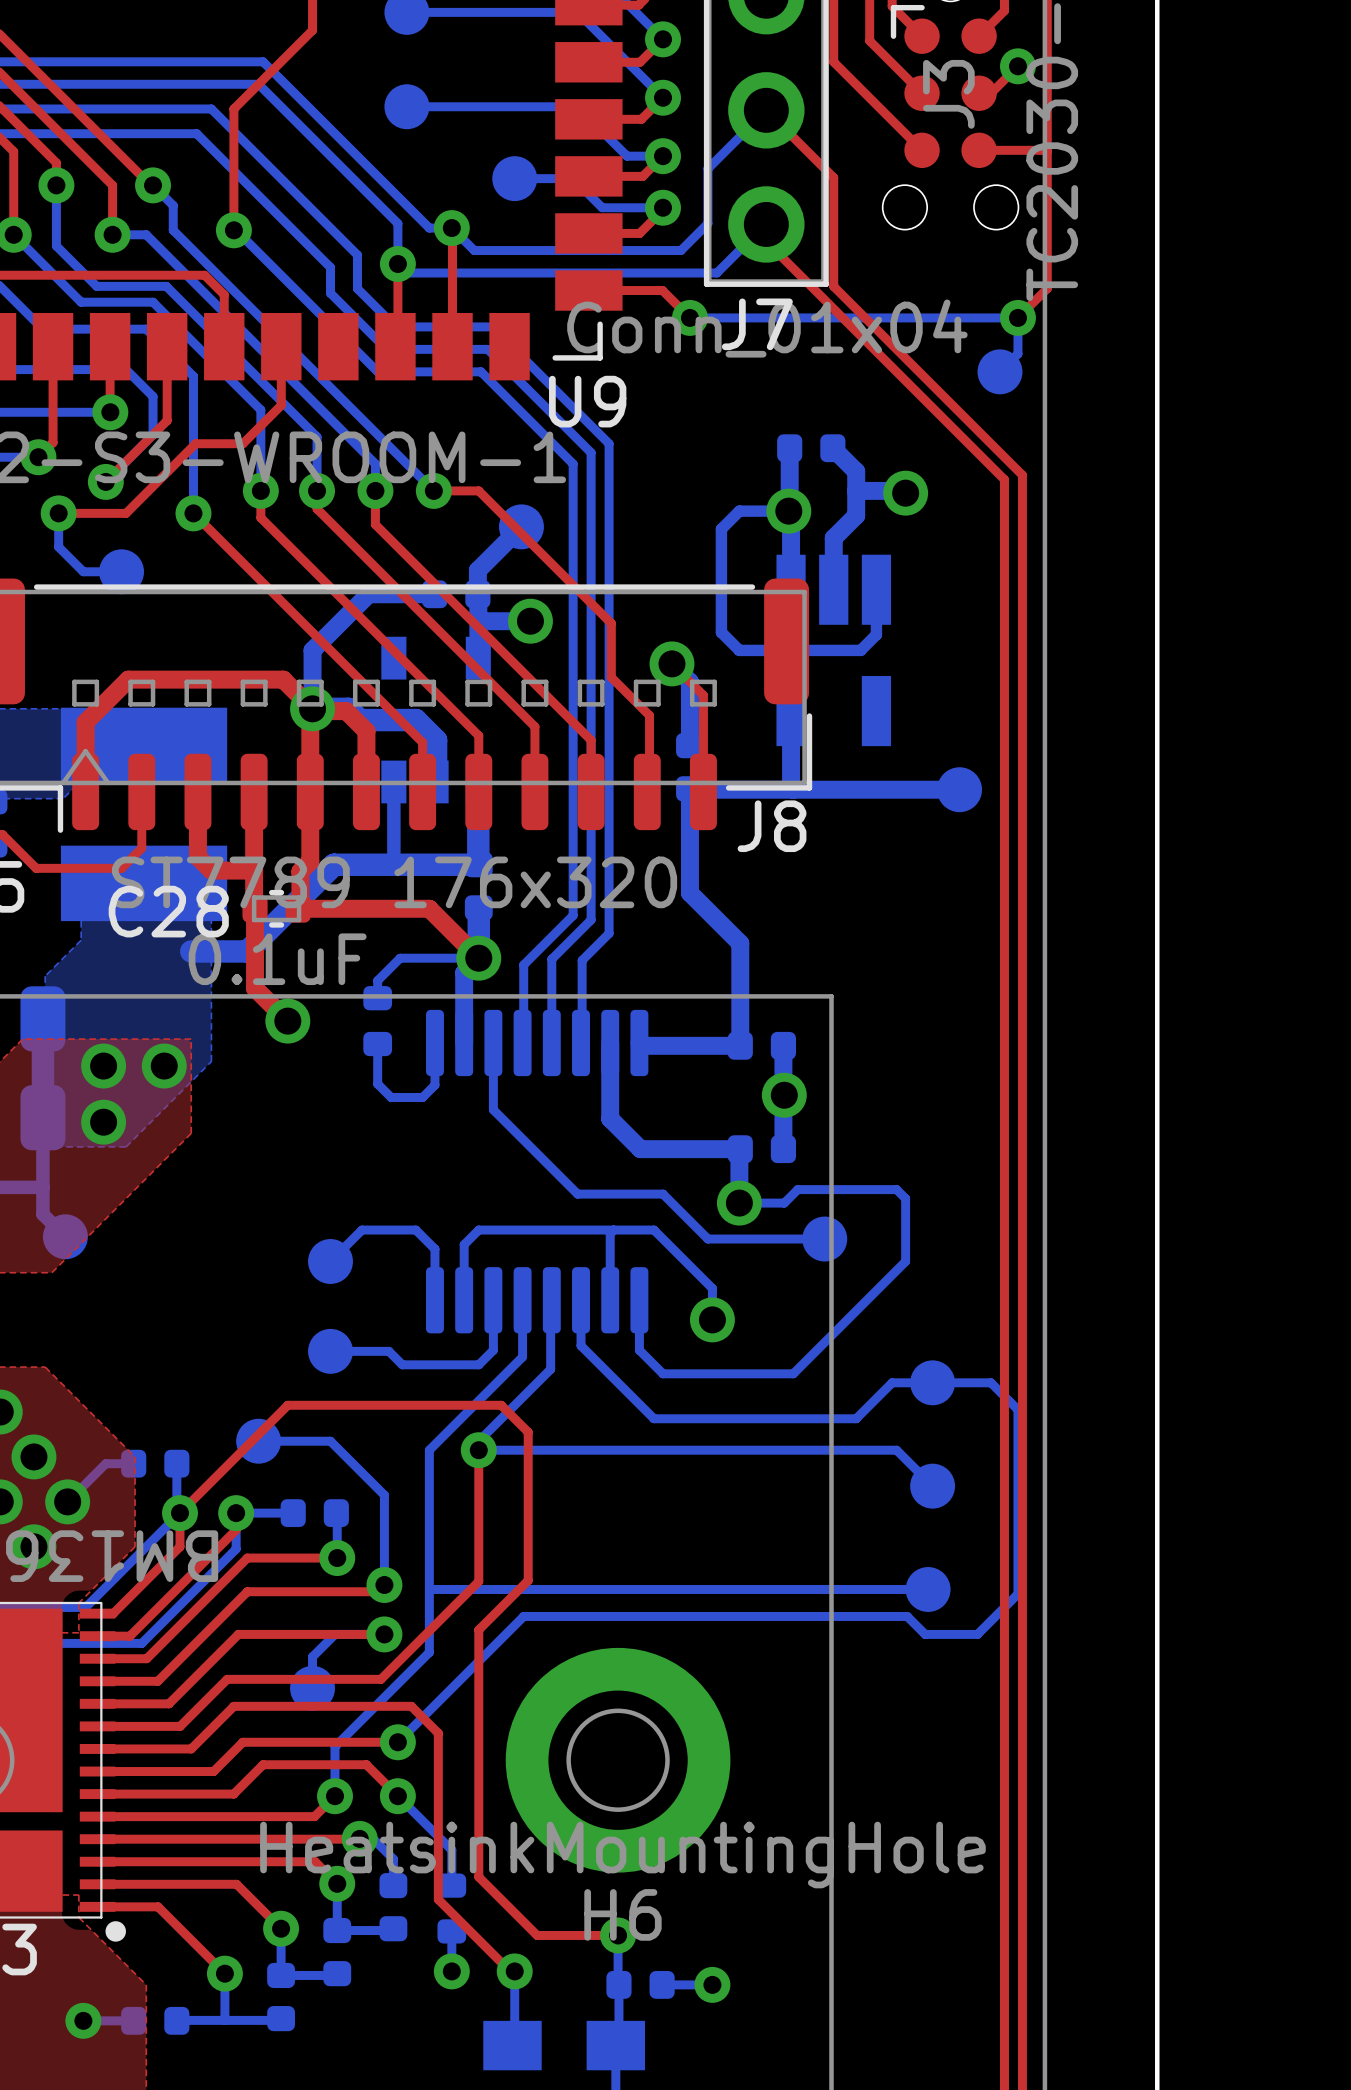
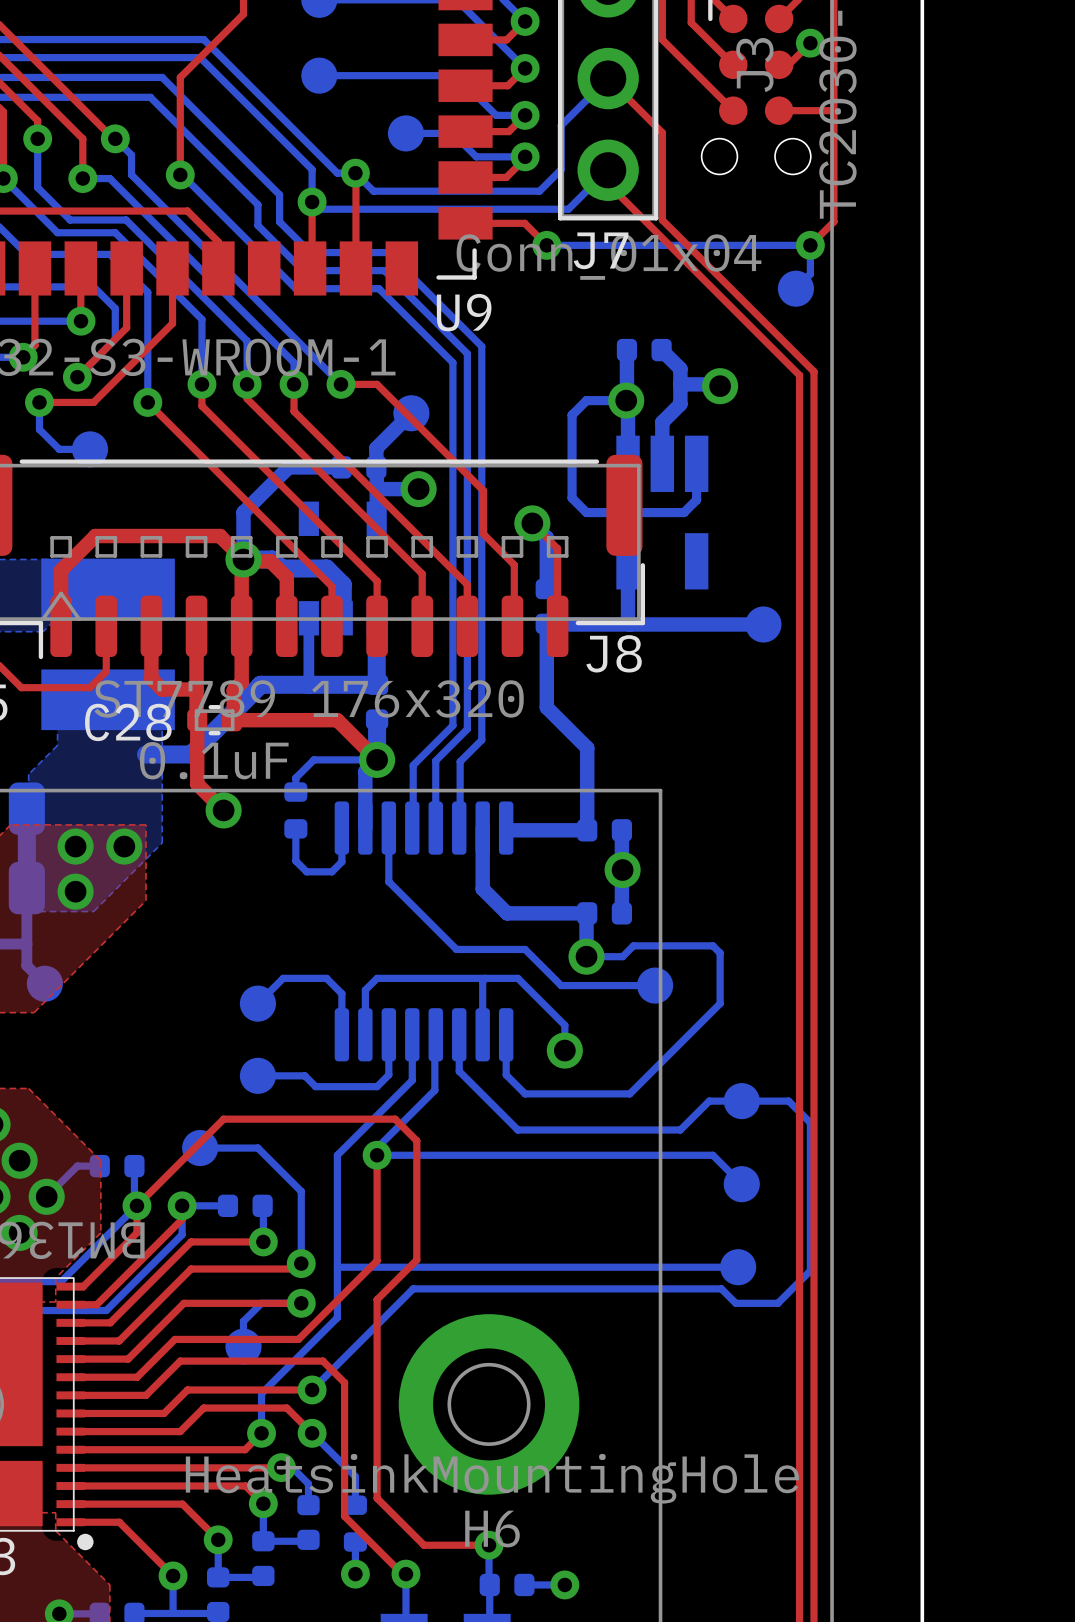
top track: (204, 275) (224, 294) (224, 346) -> (156, 211) (187, 211) (218, 241) (218, 268)
top track: (281, 346) (281, 405) (242, 443) (195, 443) -> (172, 268) (172, 323) (149, 346)

